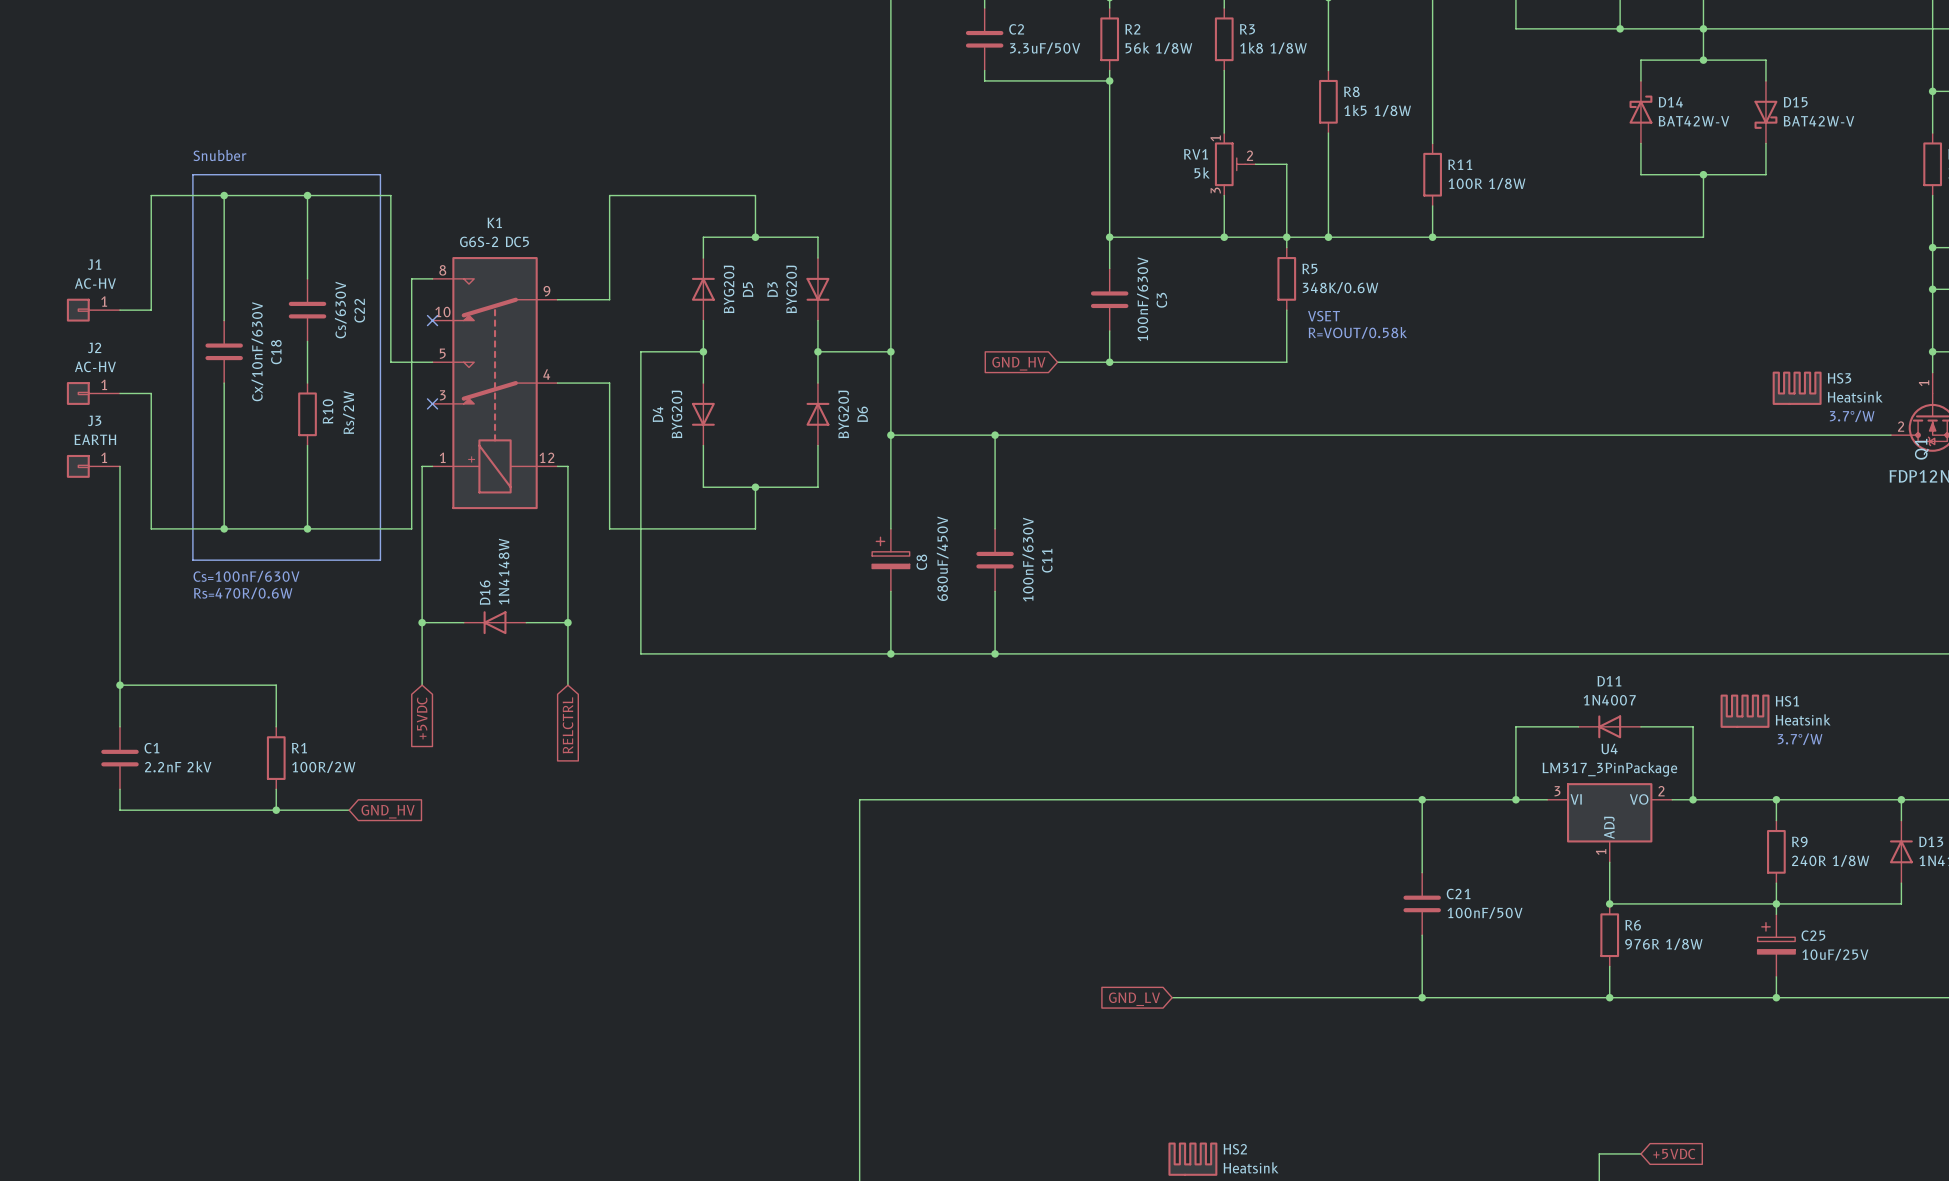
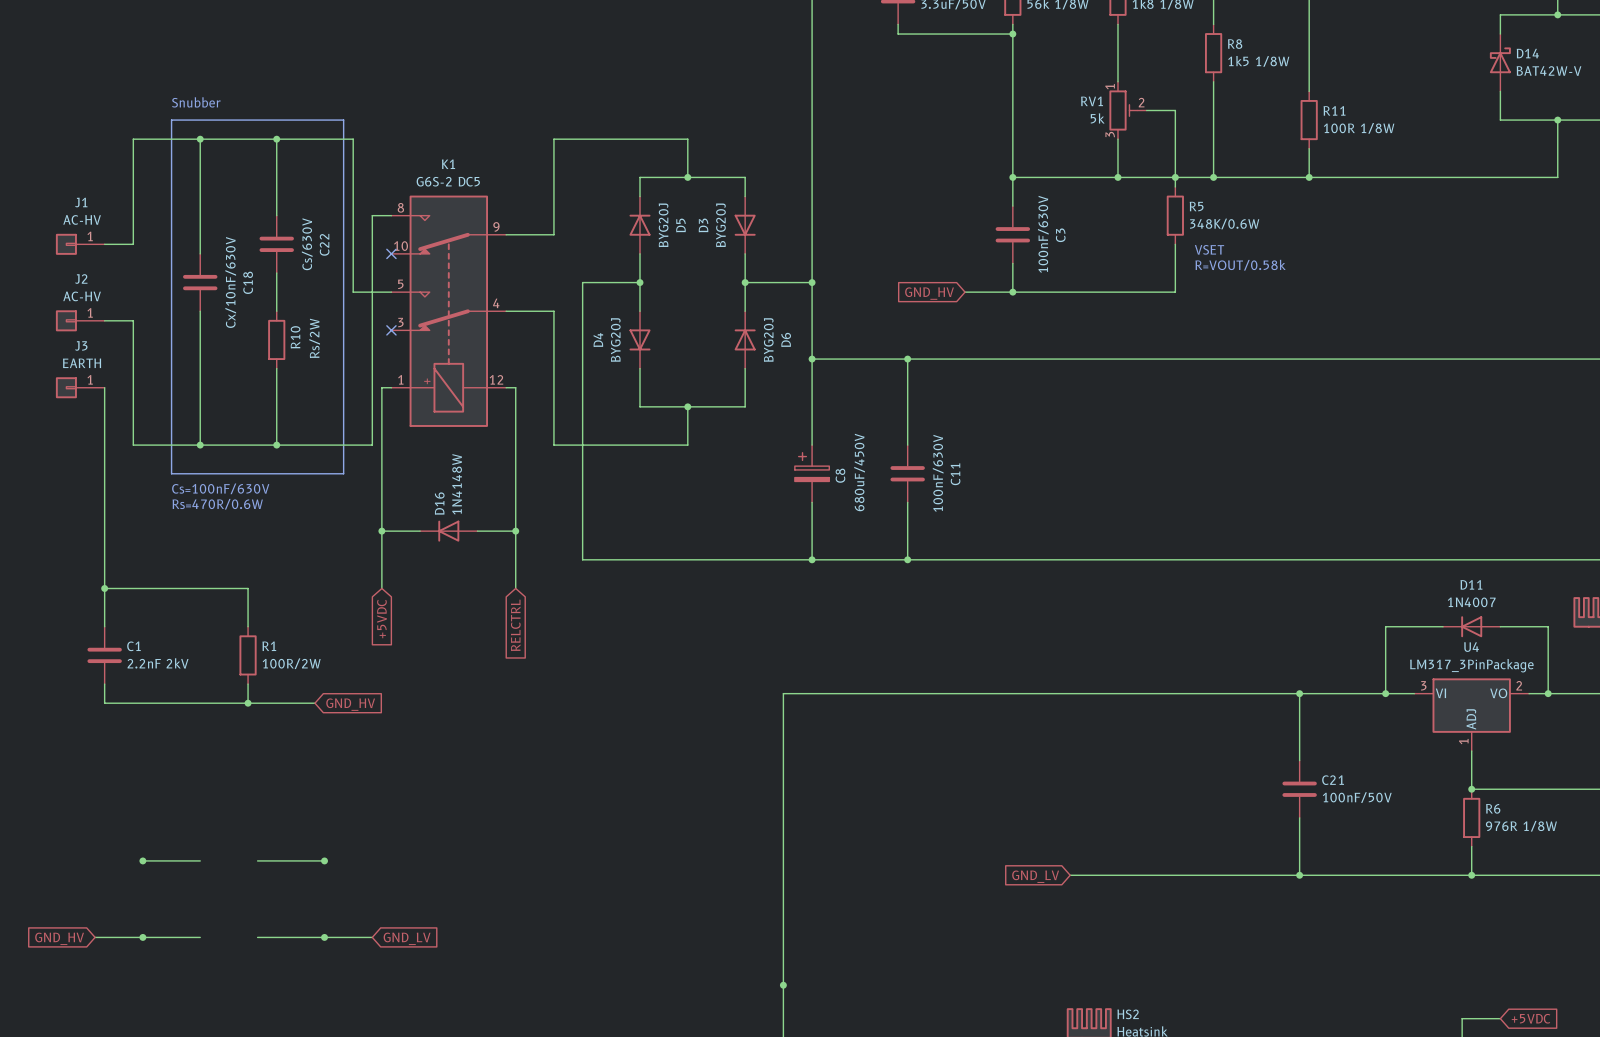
wire: none -> (142, 860) (200, 860)
junction: none -> (142, 860)
wire: none -> (257, 860) (324, 860)
junction: none -> (324, 860)
wire: none -> (95, 937) (200, 937)
junction: none -> (142, 937)
wire: none -> (257, 937) (372, 937)
junction: none -> (324, 937)
global label: none -> GND_HV (59, 938)
global label: none -> GND_LV (407, 938)
junction: none -> (783, 985)

